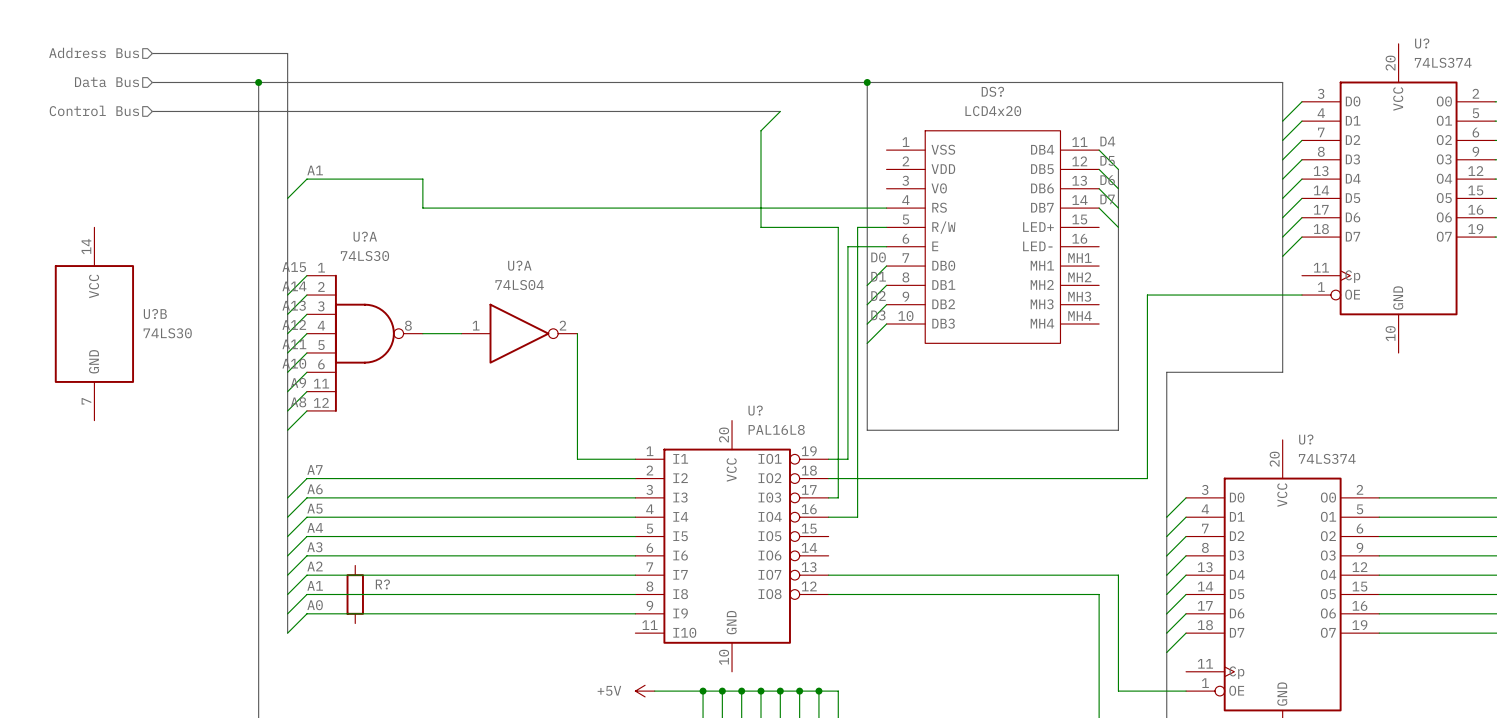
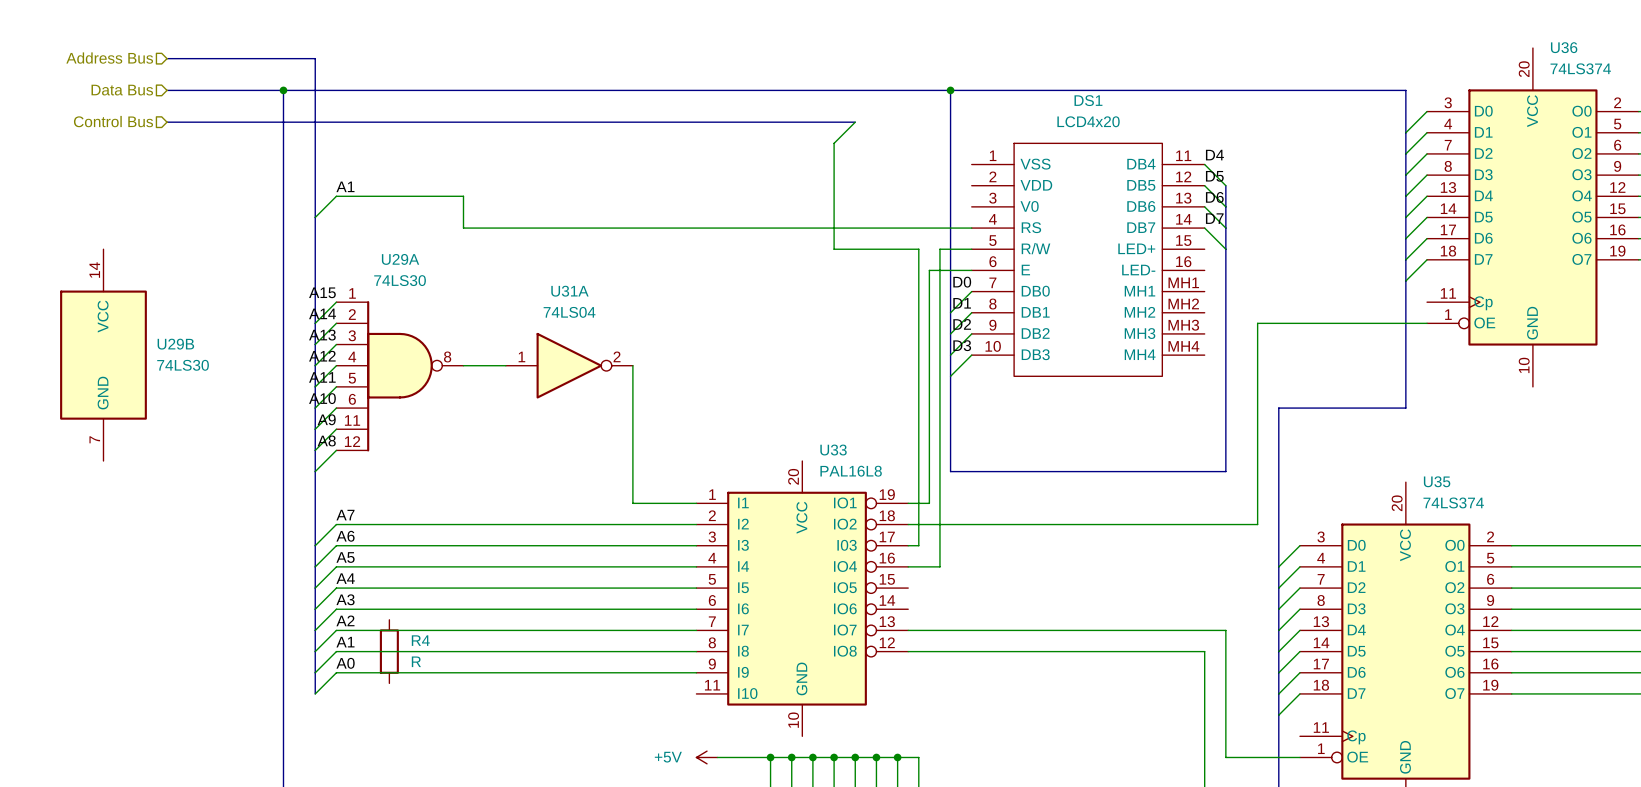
U? name: U? (1422, 43) -> U36 (1564, 47)
DS? name: DS? (992, 91) -> DS1 (1088, 100)
U?A name: U?A (365, 236) -> U29A (400, 259)
U?A name: U?A (519, 265) -> U31A (569, 291)
U?B name: U?B (155, 313) -> U29B (175, 344)
U? name: U? (755, 410) -> U33 (833, 450)
U? name: U? (1306, 439) -> U35 (1437, 481)
R? name: R? (382, 584) -> R4 (420, 640)
R? value: none -> R (416, 661)

